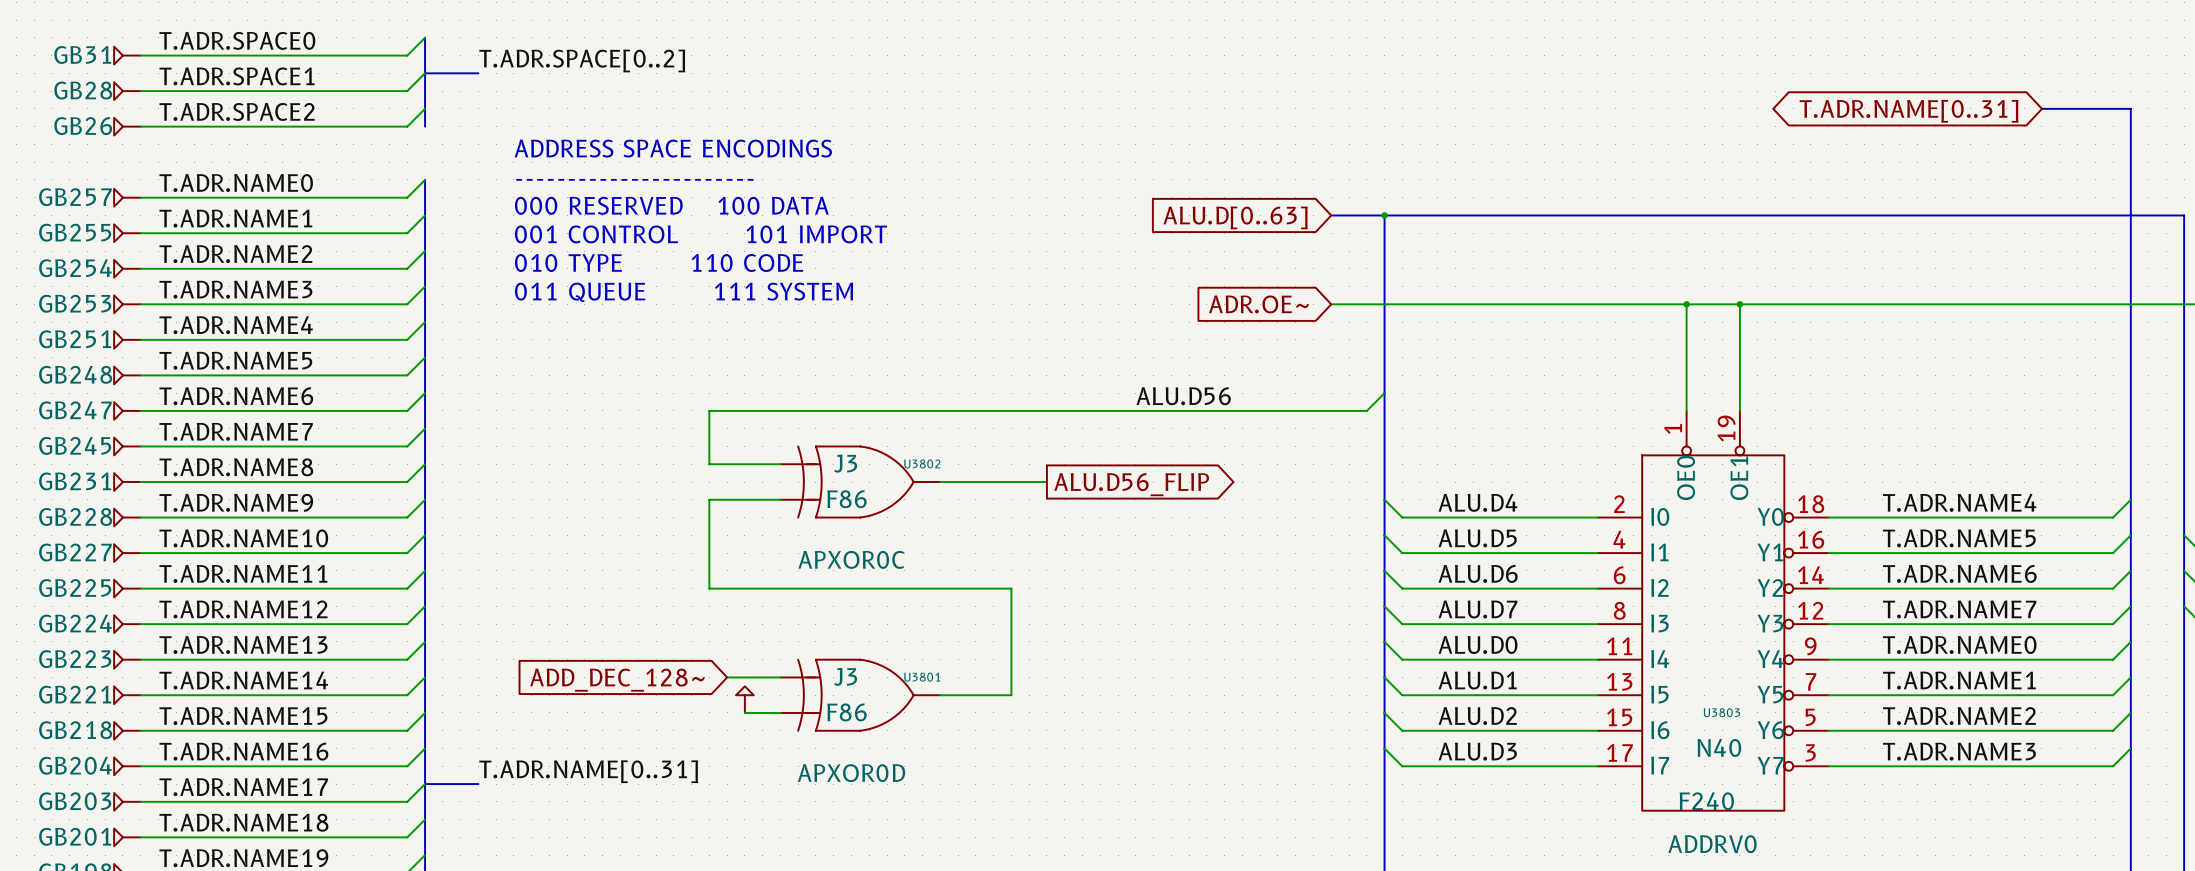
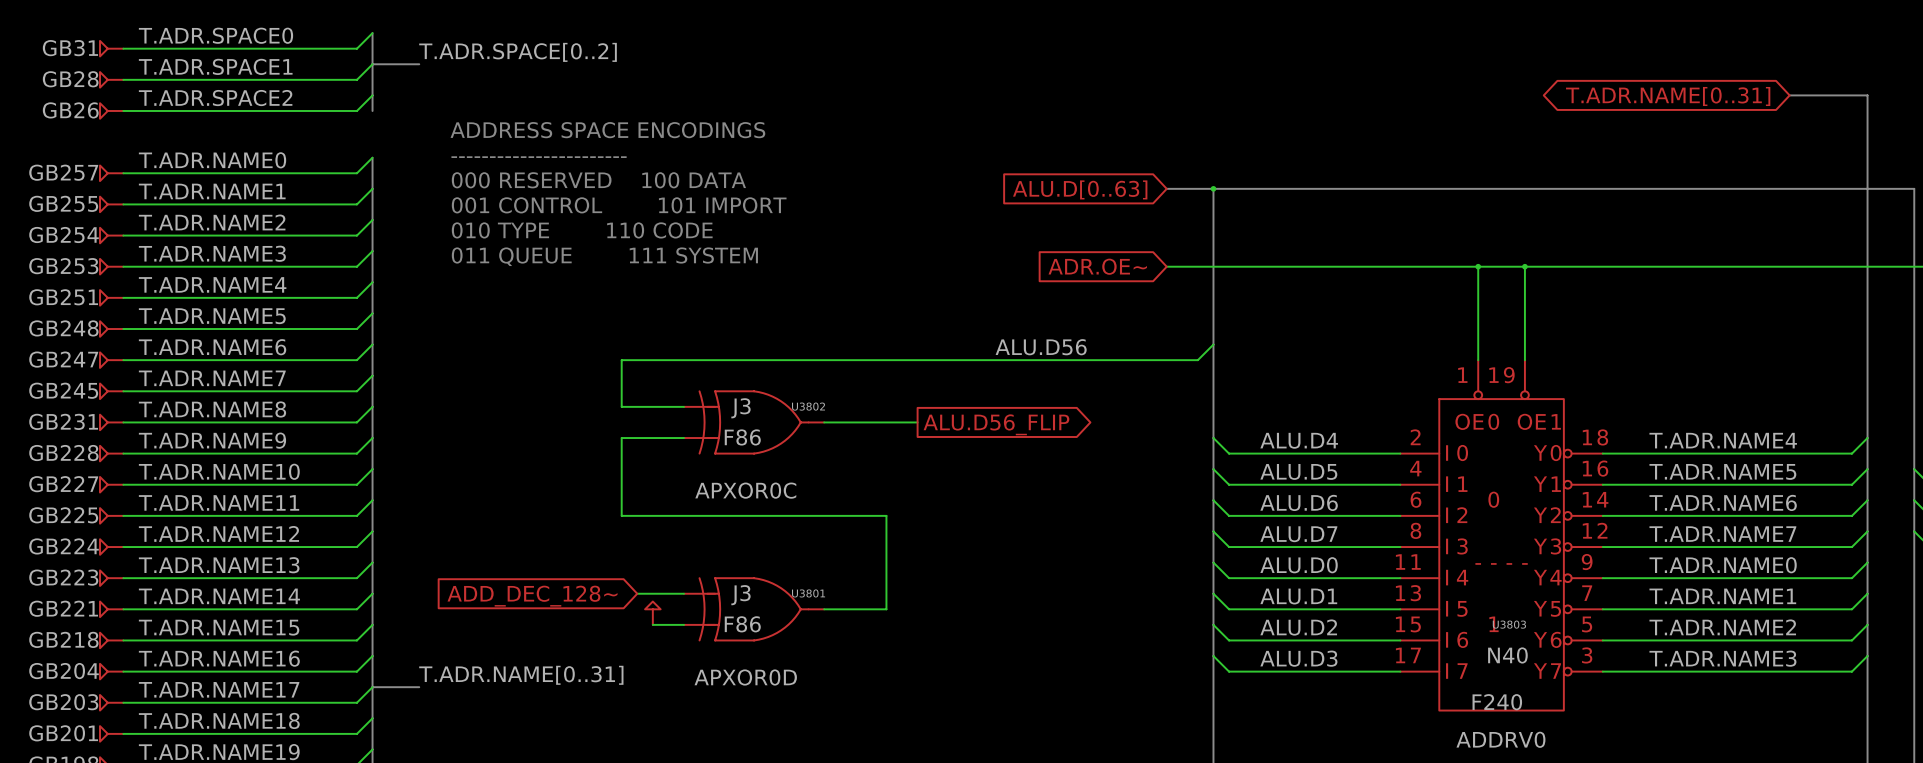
U3803 symbol: [1597, 410, 1829, 811] -> [1400, 360, 1603, 711]

